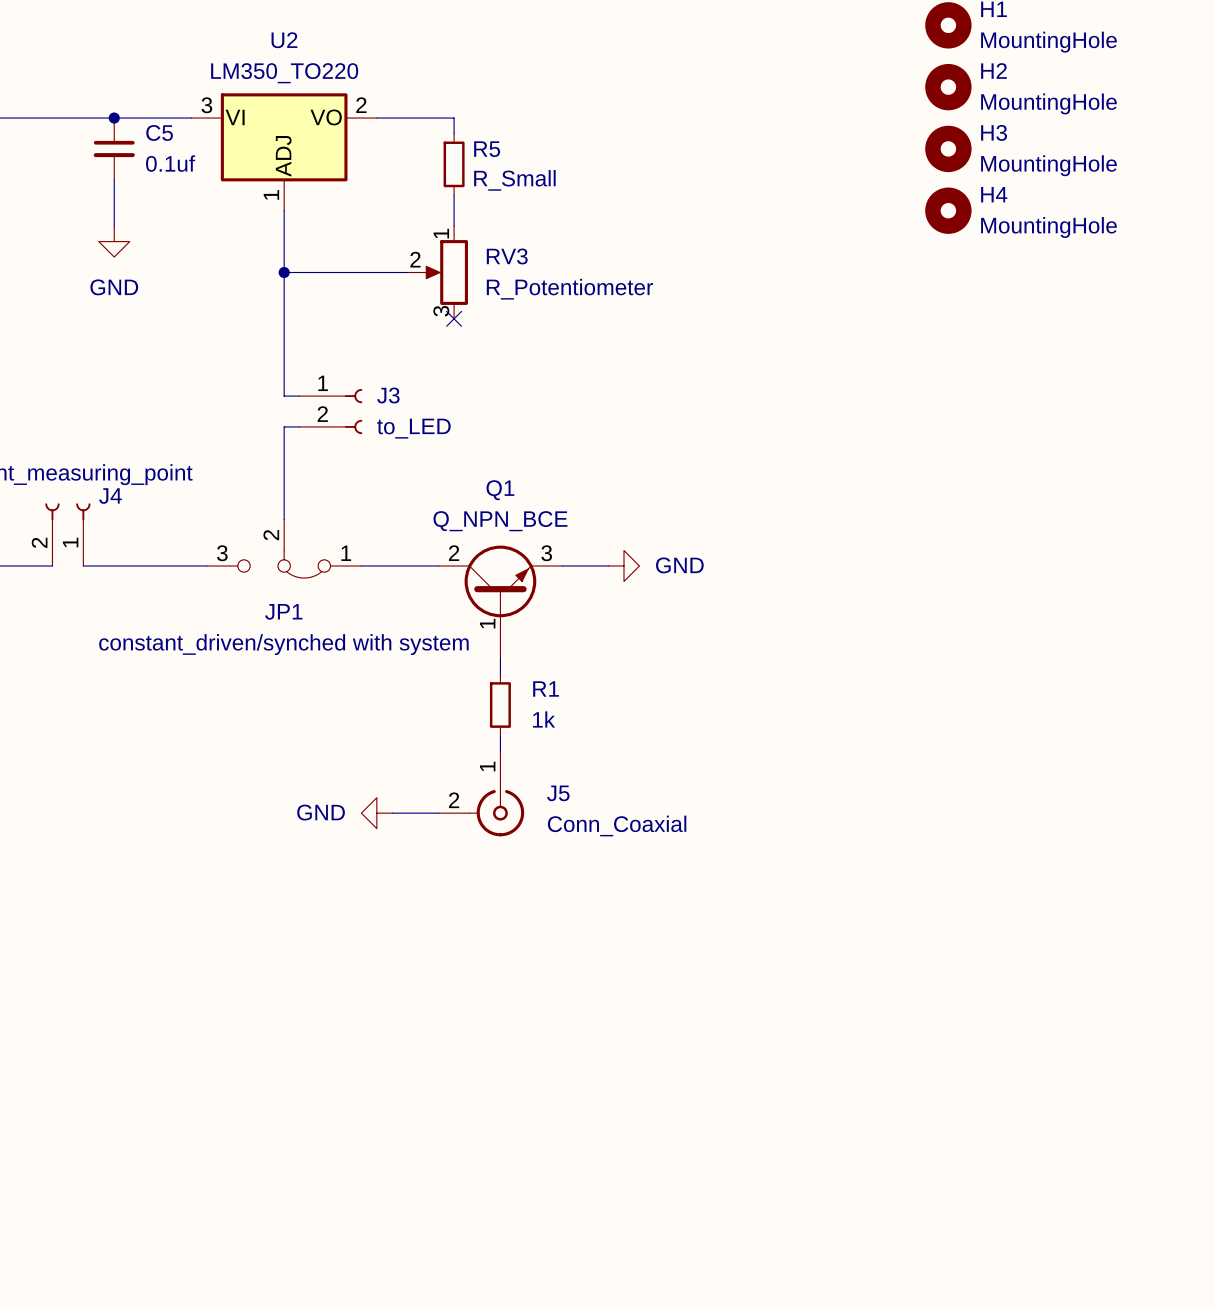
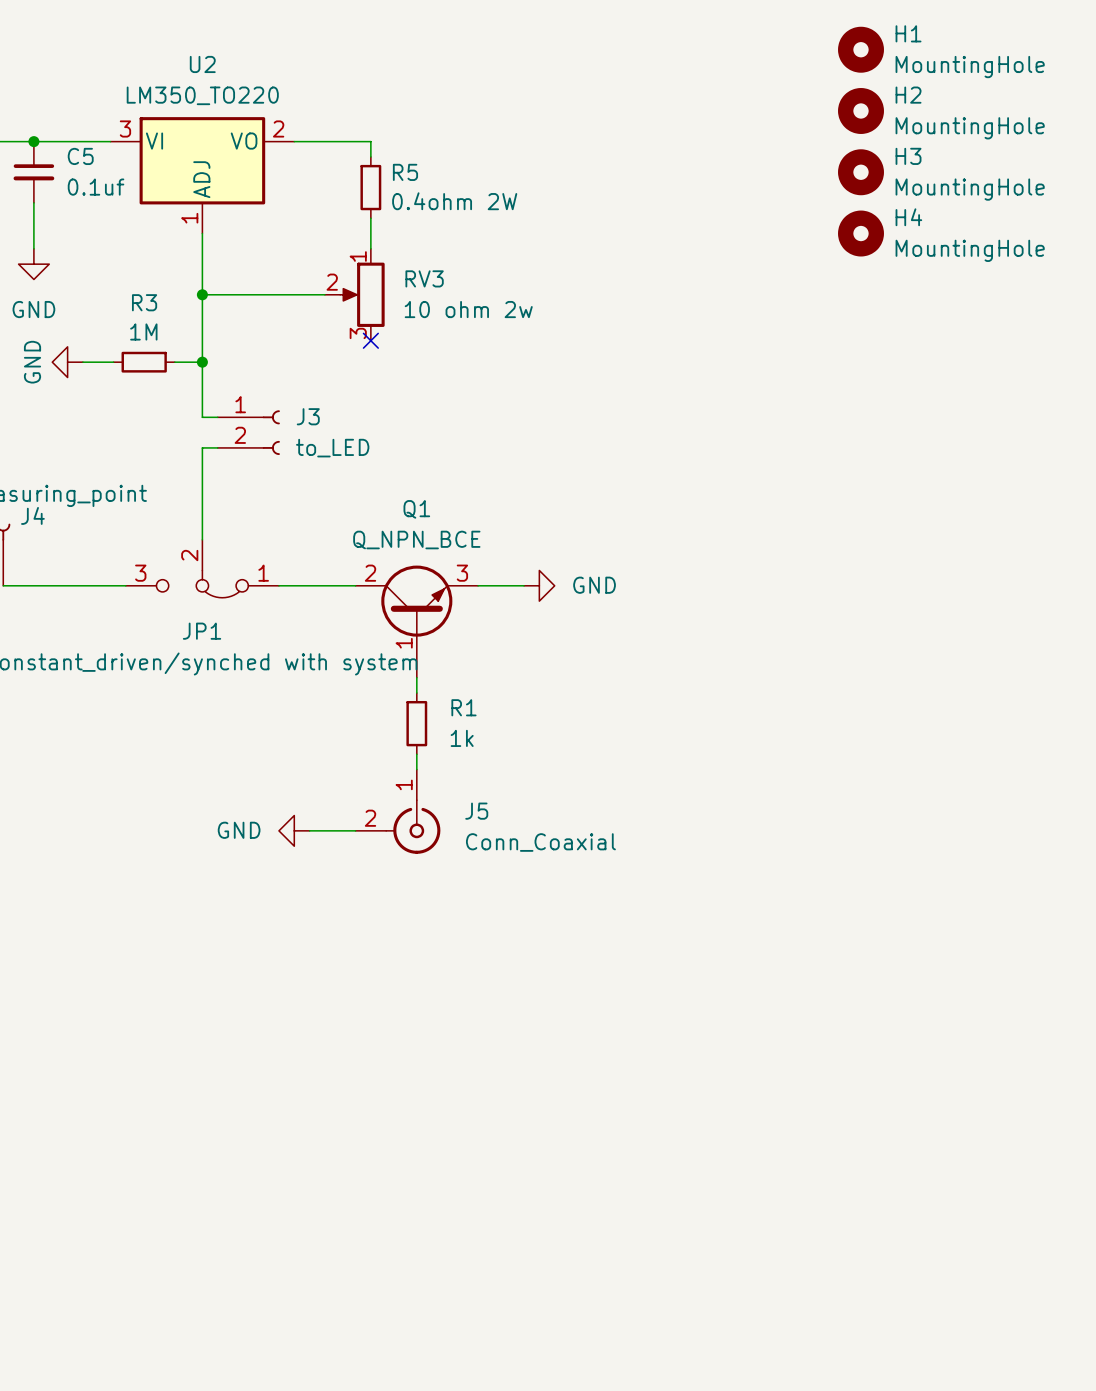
R5 value: R_Small (514, 180) -> 0.4ohm 2W (454, 201)
RV3 value: R_Potentiometer (569, 289) -> 10 ohm 2w (468, 309)
power symbol: none -> GND (67, 362)
wire: none -> (82, 362) (113, 362)
R3: none -> 1M (144, 362)
wire: none -> (174, 362) (202, 362)
junction: none -> (202, 362)

